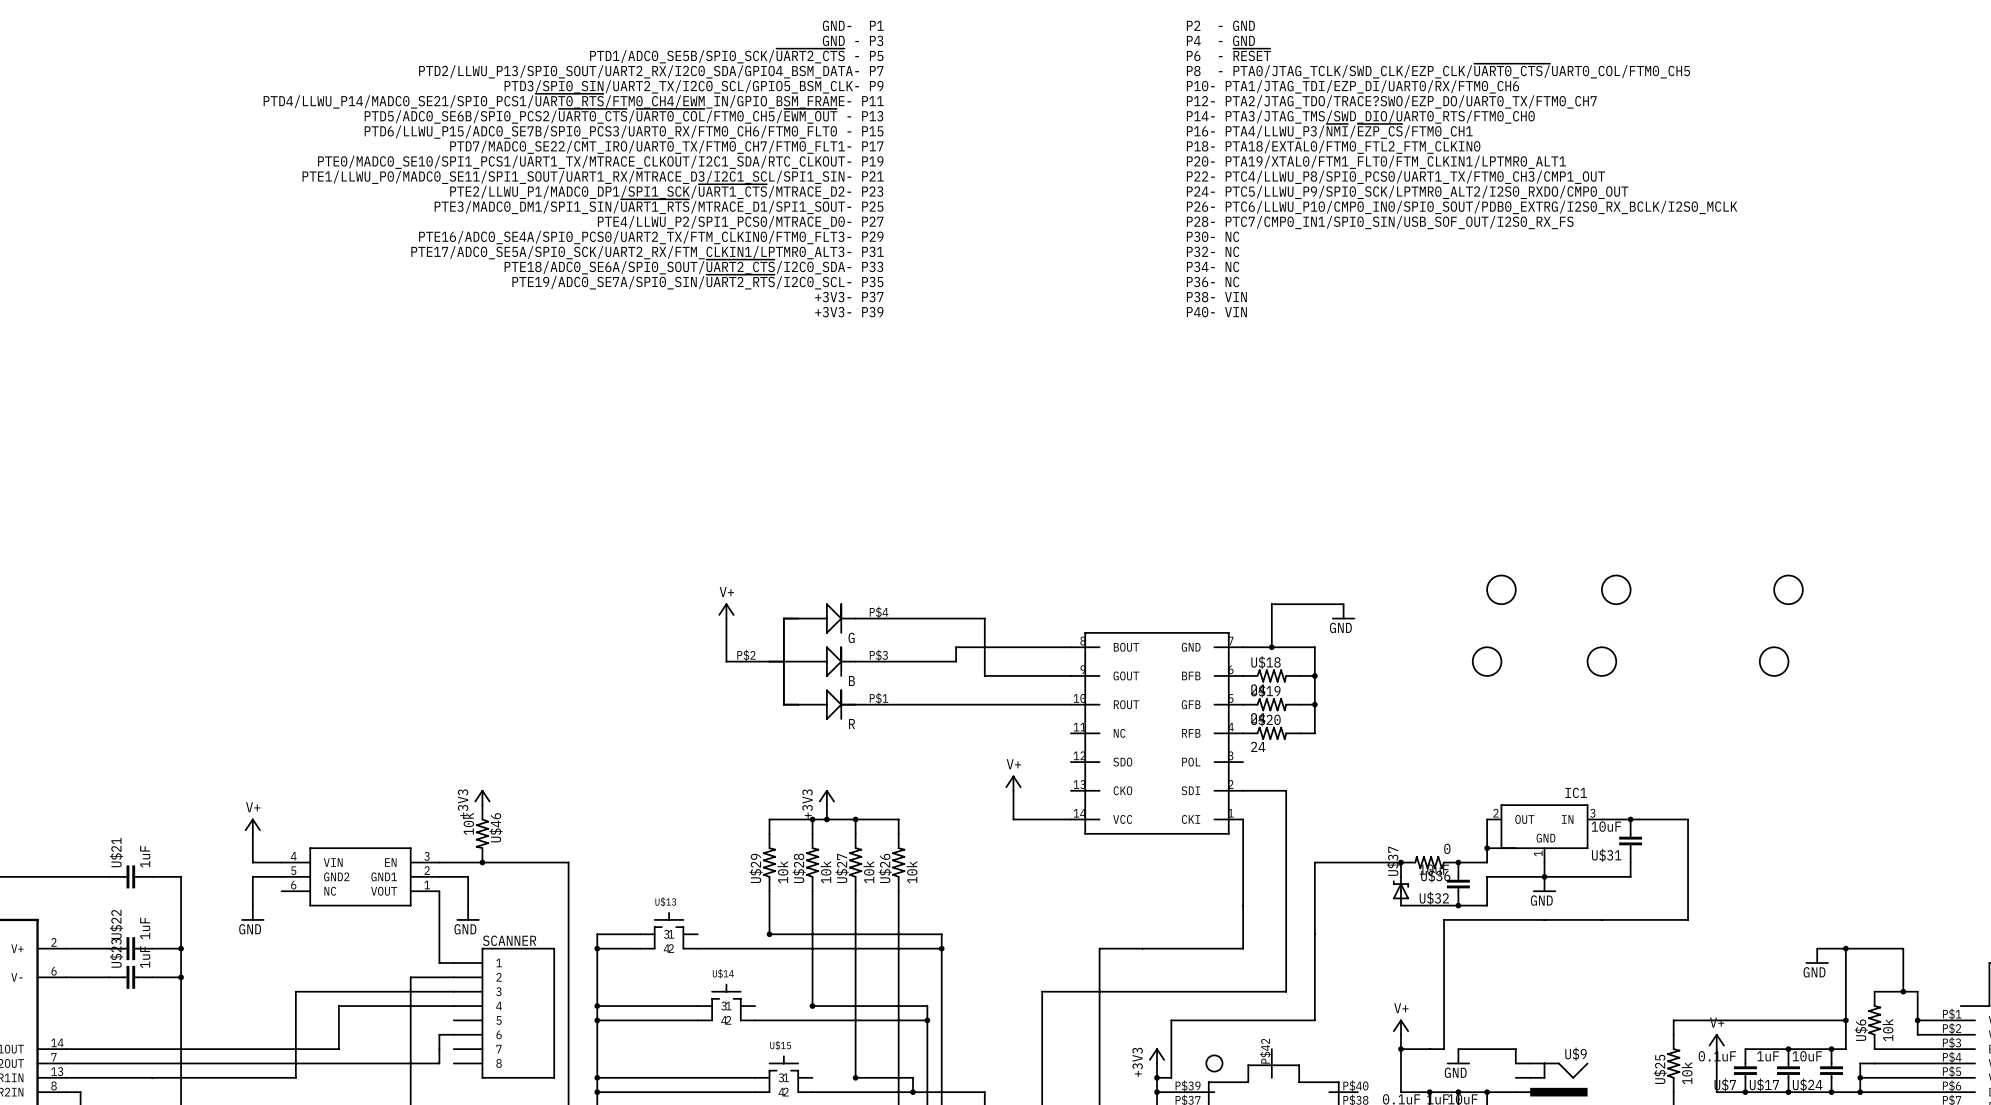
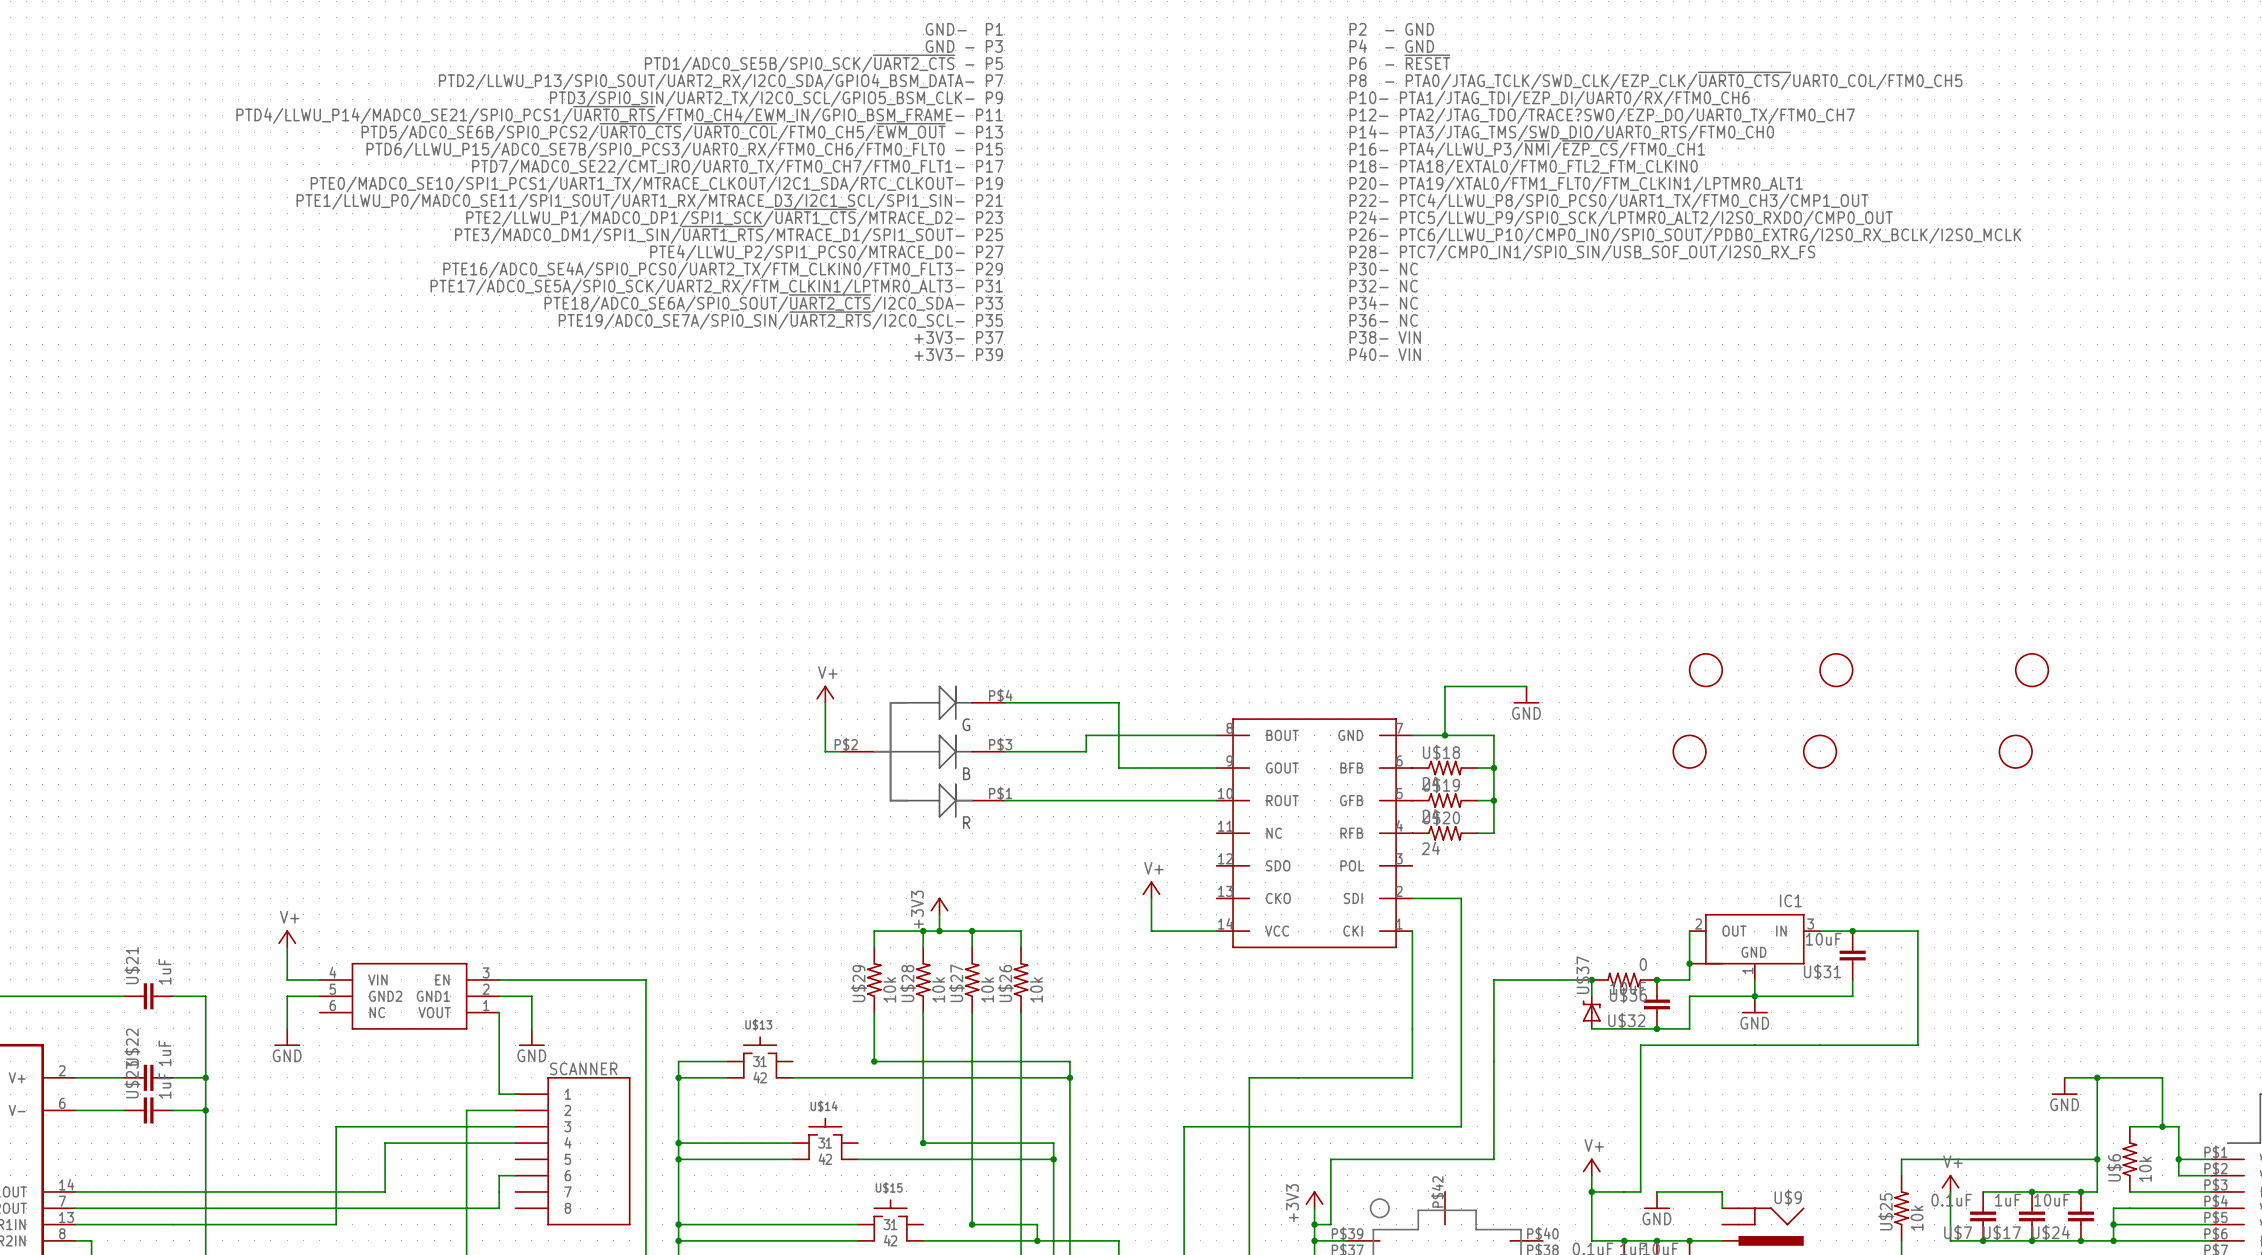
power symbol: +3V3 (482, 797) -> none
U$46: 10k (482, 833) -> none
junction: (482, 862) -> none

